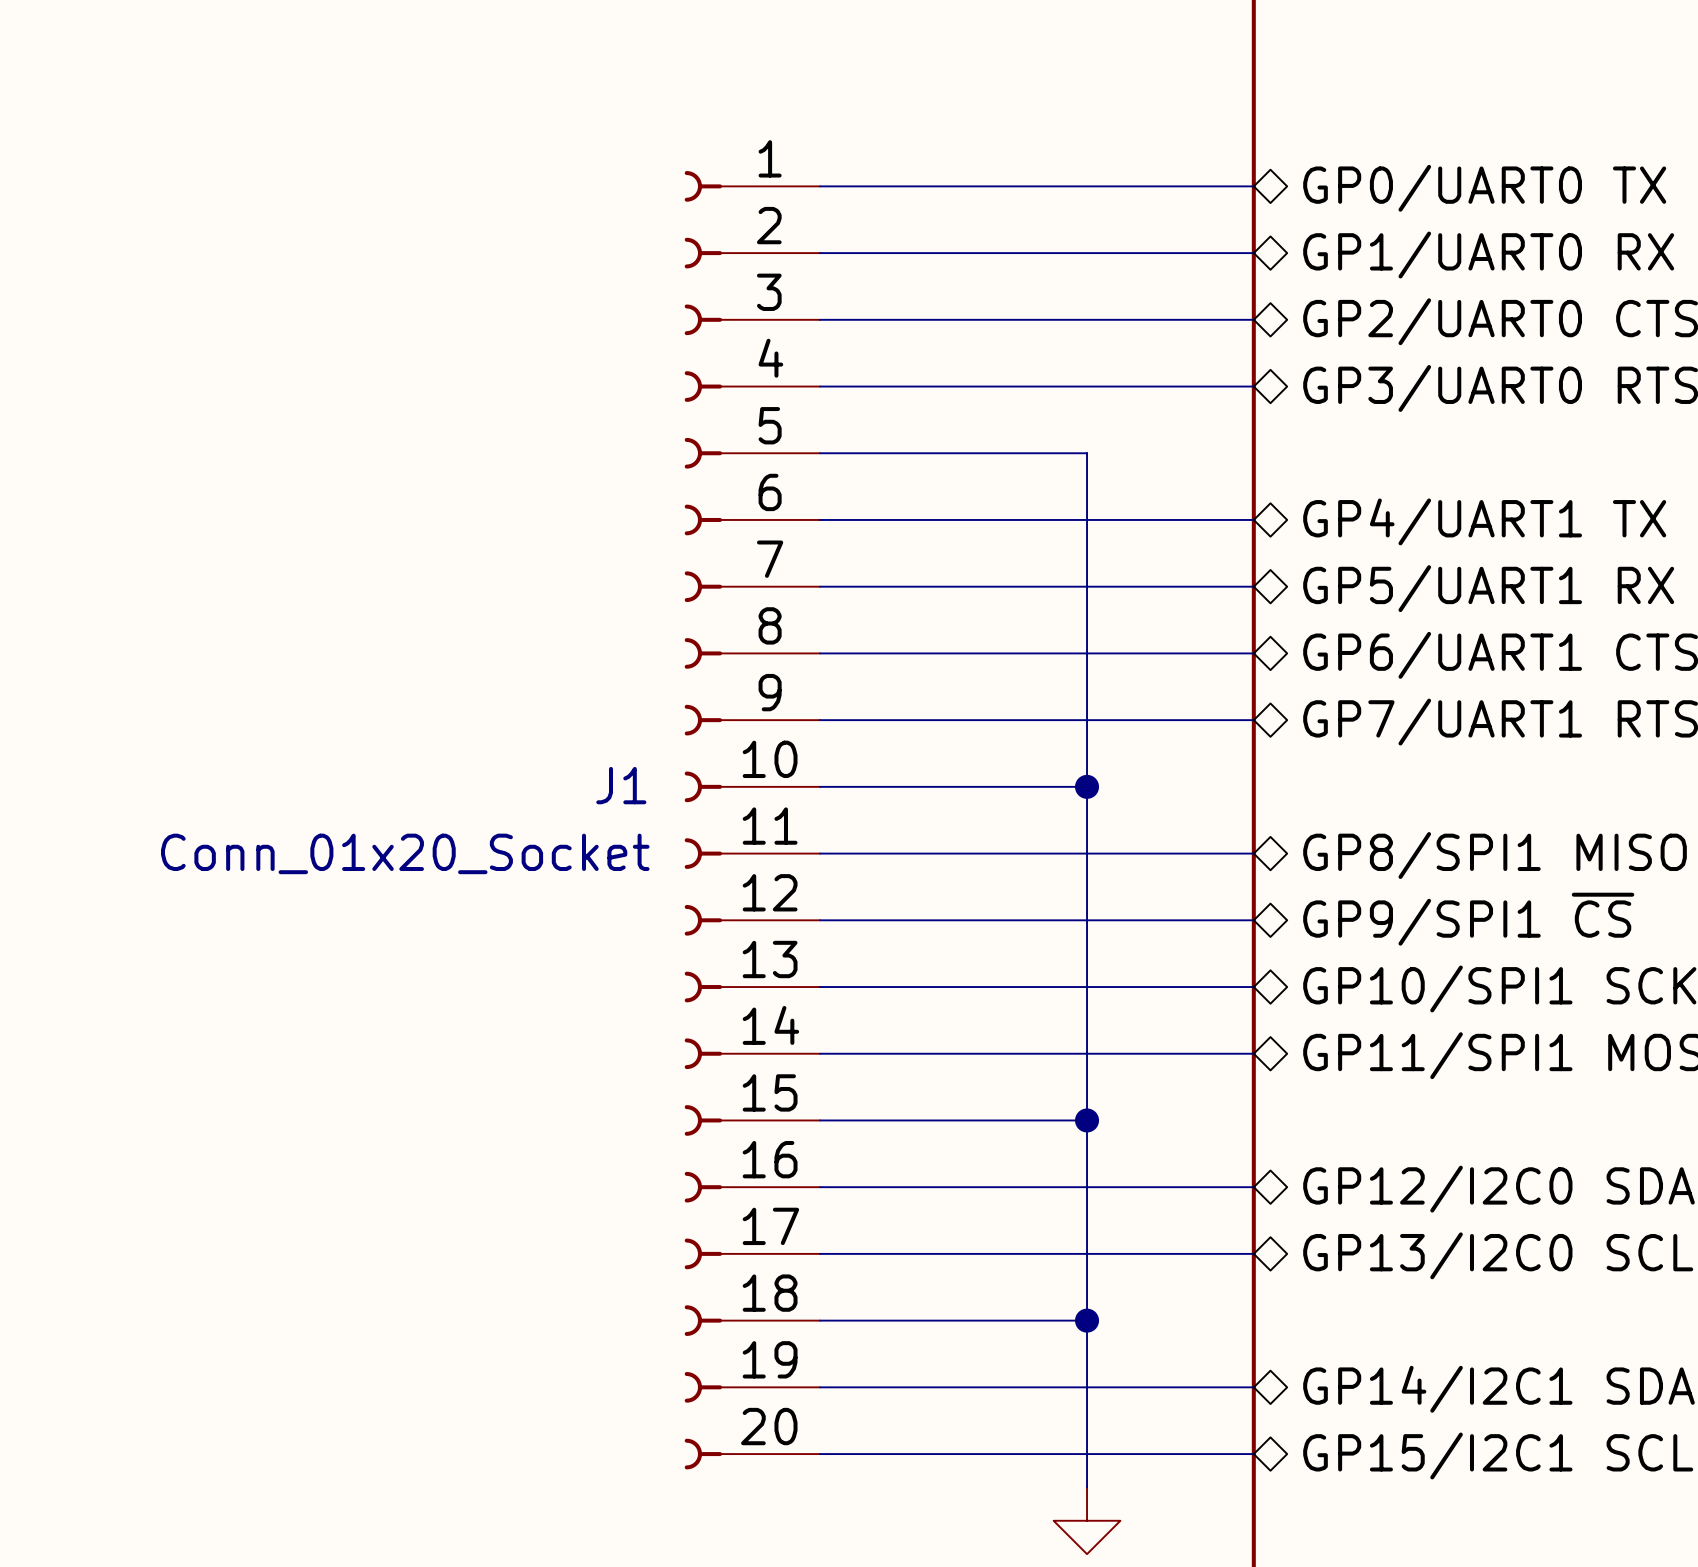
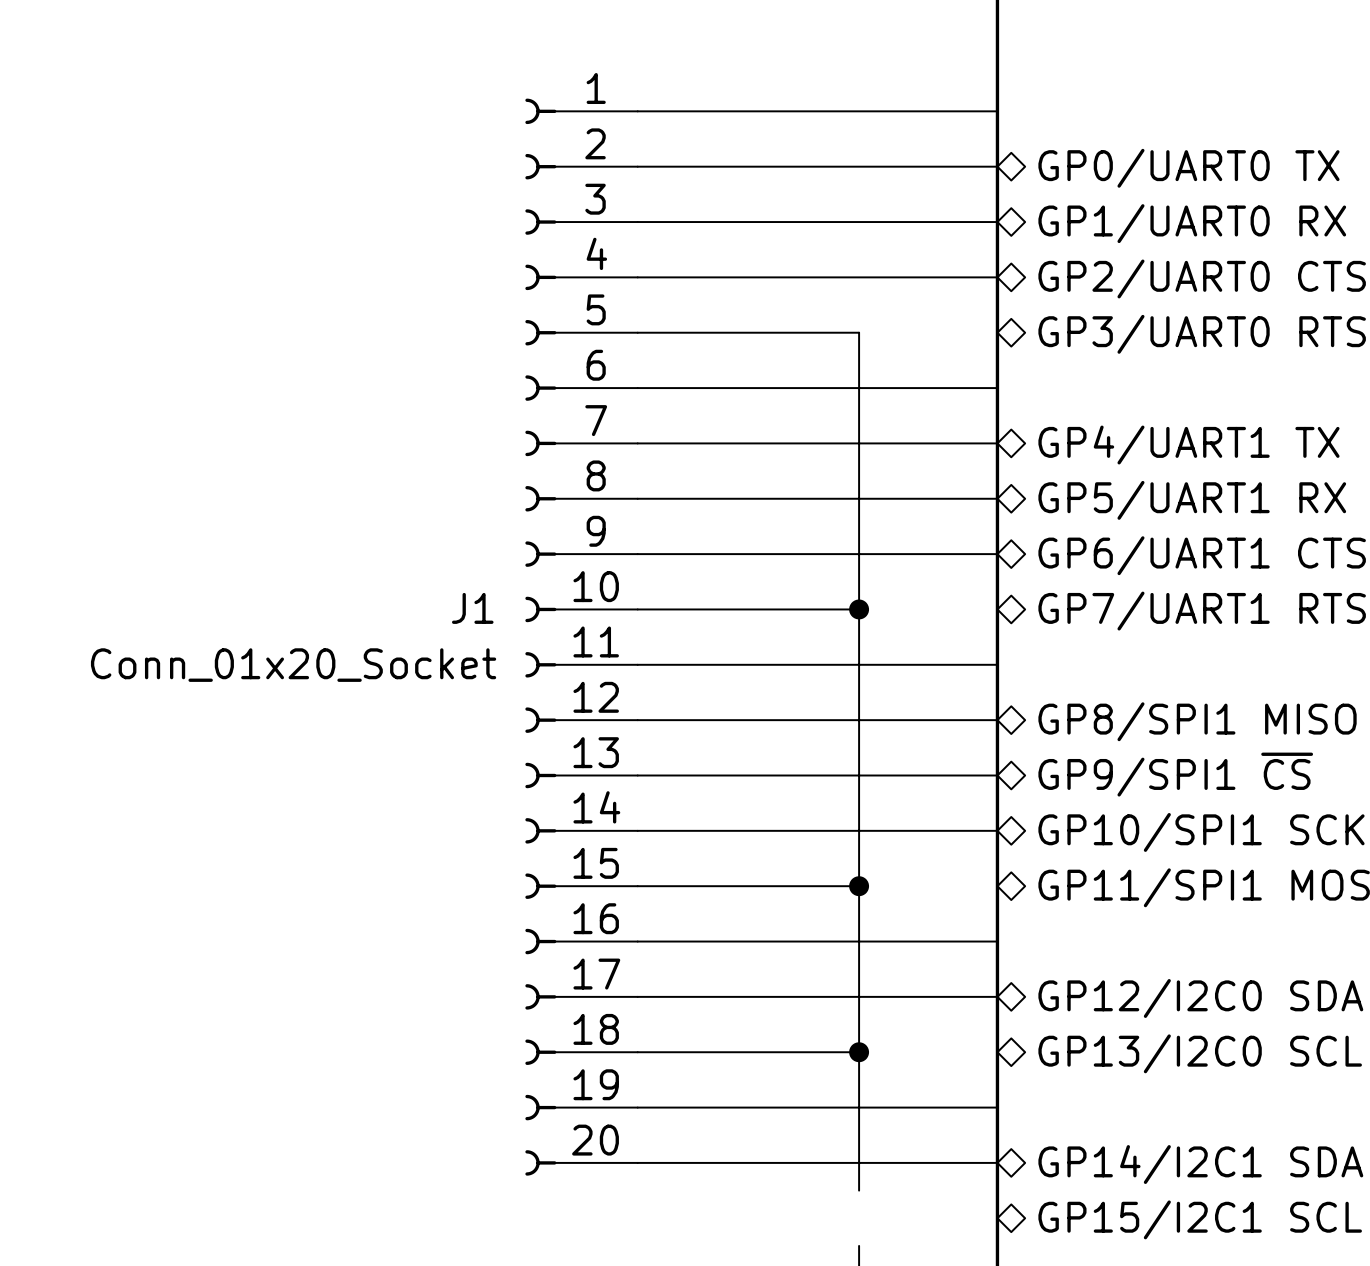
wire: none -> (637, 111) (997, 111)
wire: (1087, 386) (1253, 386) -> (859, 332) (859, 388) (997, 388)
wire: (1087, 720) (1253, 720) -> (859, 664) (997, 664)
junction position: (1087, 786) -> (859, 609)
J1 position: (752, 820) -> (581, 637)
wire: (1087, 1053) (1253, 1053) -> (859, 941) (997, 941)
junction: none -> (859, 886)
junction: (1087, 1120) -> none
wire: (1087, 1253) (1253, 1253) -> (859, 1107) (997, 1107)
junction: none -> (859, 1052)
junction: (1087, 1320) -> none
wire: (1087, 1420) (1087, 1487) -> none
wire: (820, 1454) (1253, 1454) -> none

